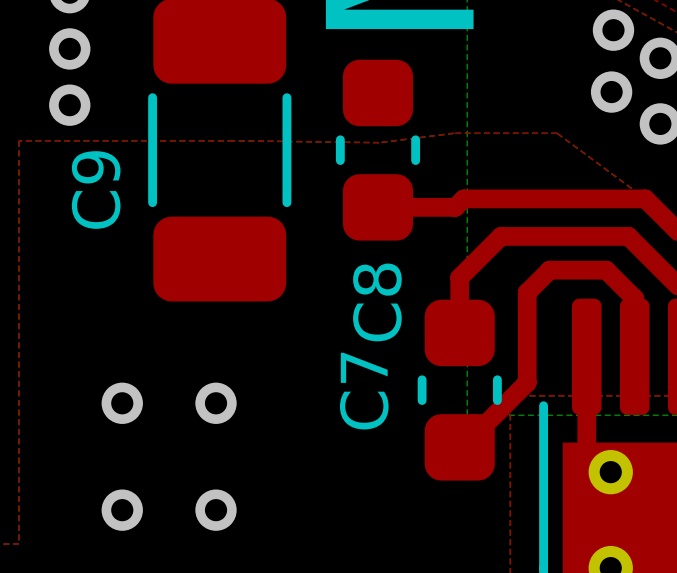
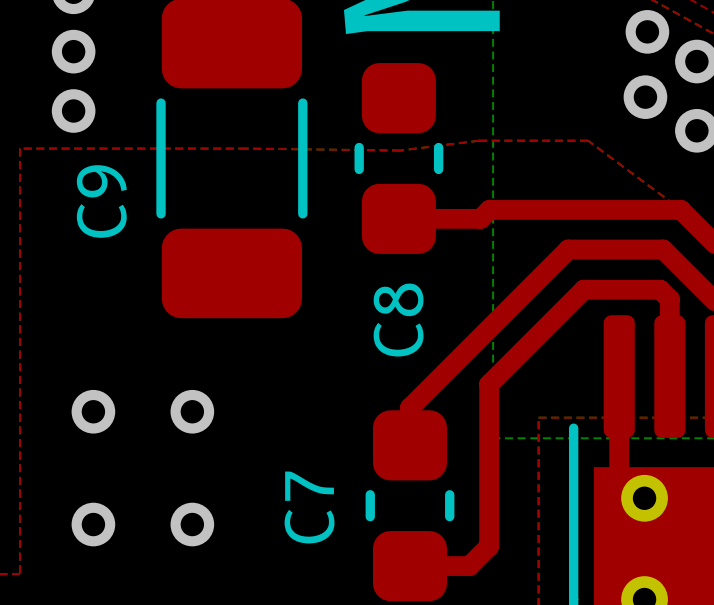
top track: (538, 236) (500, 236) (459, 277) (459, 332) -> (568, 249) (409, 407) (409, 445)
top track: (634, 298) (606, 270) (549, 270) (527, 292) (527, 382) (462, 447) (459, 447) -> (669, 315) (669, 299) (660, 289) (583, 289) (489, 384) (489, 546) (469, 566) (409, 566)
C7 position: (459, 390) -> (409, 505)
via position: (122, 403) -> (93, 411)
via position: (216, 403) -> (192, 411)
via position: (122, 510) -> (93, 524)
via position: (216, 510) -> (192, 524)

